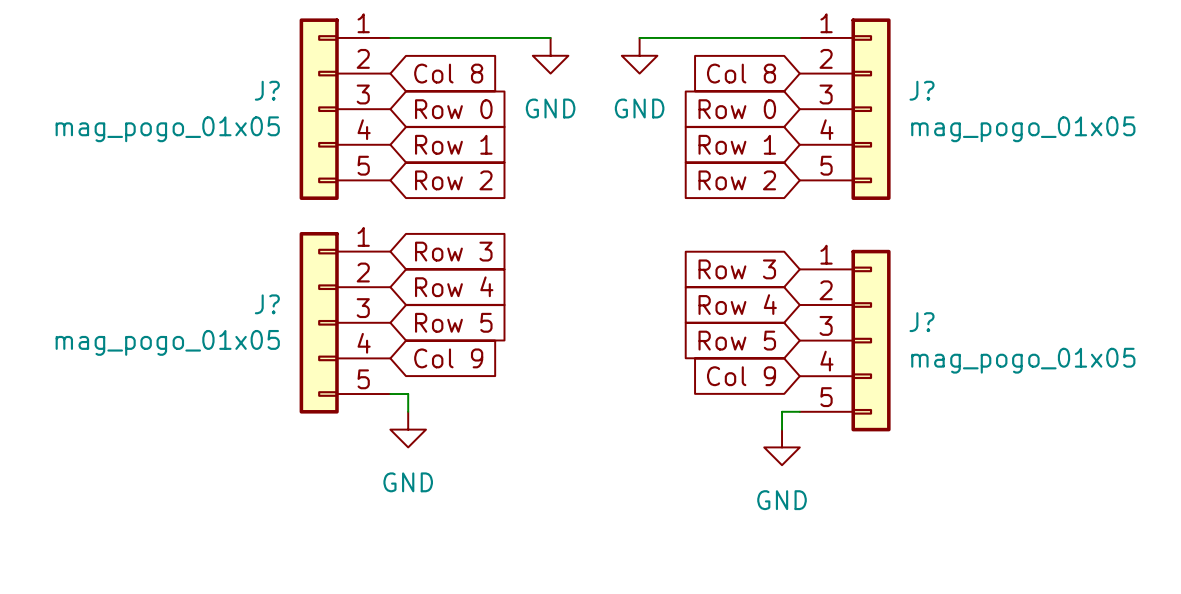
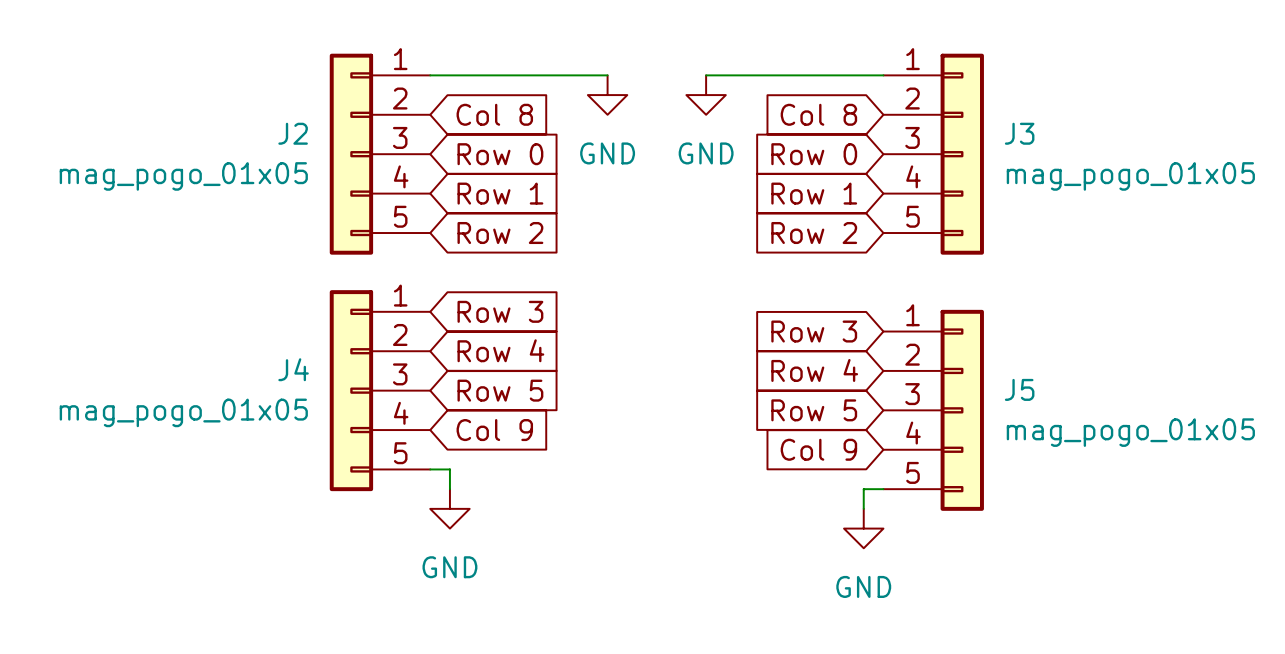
J? name: J? (267, 90) -> J2 (293, 133)
J? name: J? (922, 90) -> J3 (1019, 133)
J? name: J? (267, 304) -> J4 (293, 369)
J? name: J? (922, 322) -> J5 (1019, 389)

